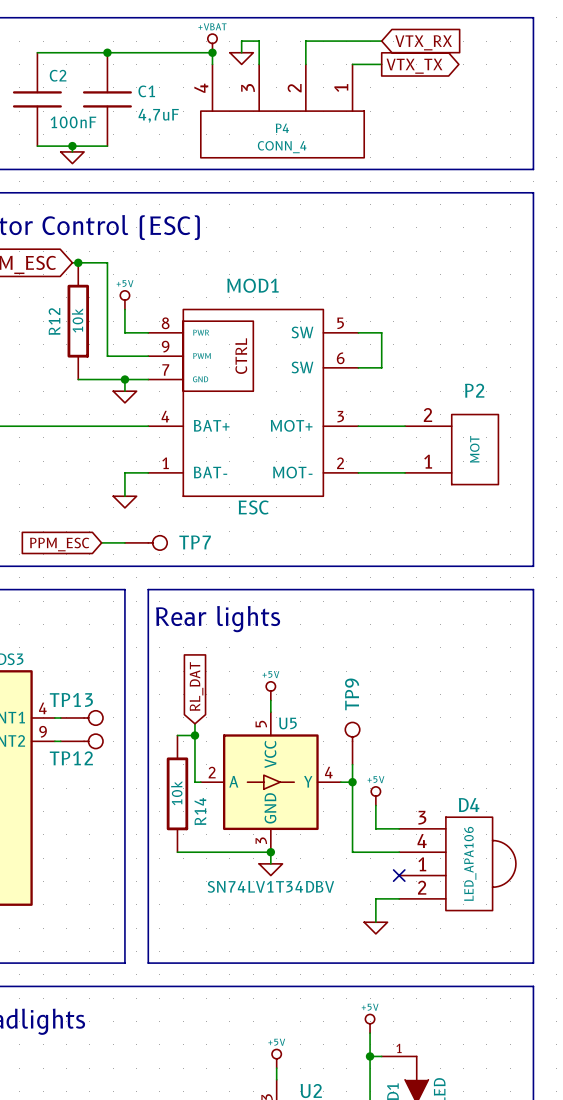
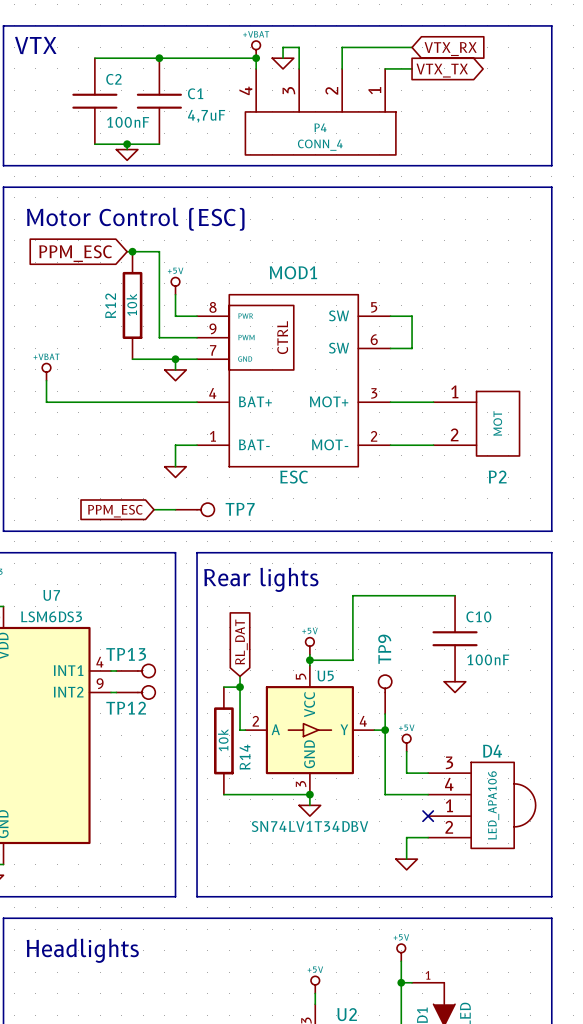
P2 flip: as is (475, 449) -> up-down (498, 423)
wire: none -> (455, 595) (352, 595) (352, 660) (309, 660)
C10: none -> 100nF (455, 638)
junction: none -> (309, 660)
power symbol: none -> (455, 687)

